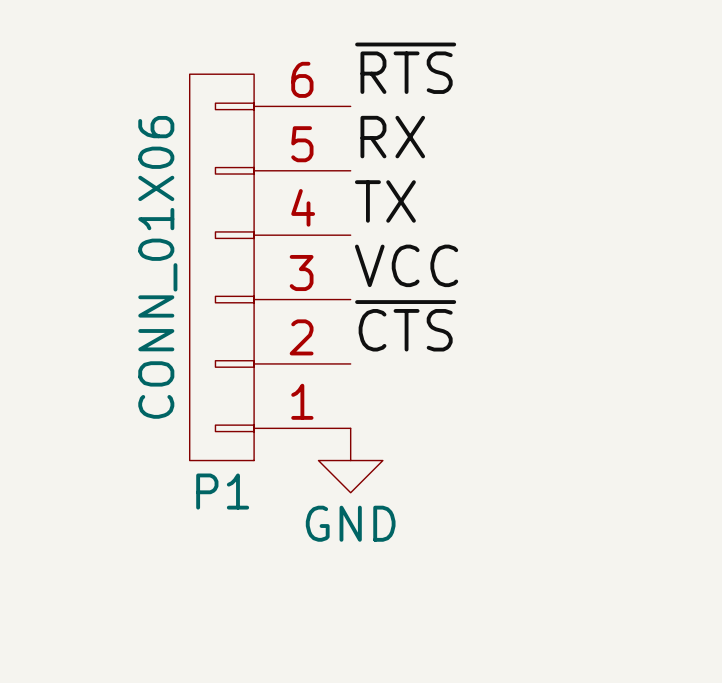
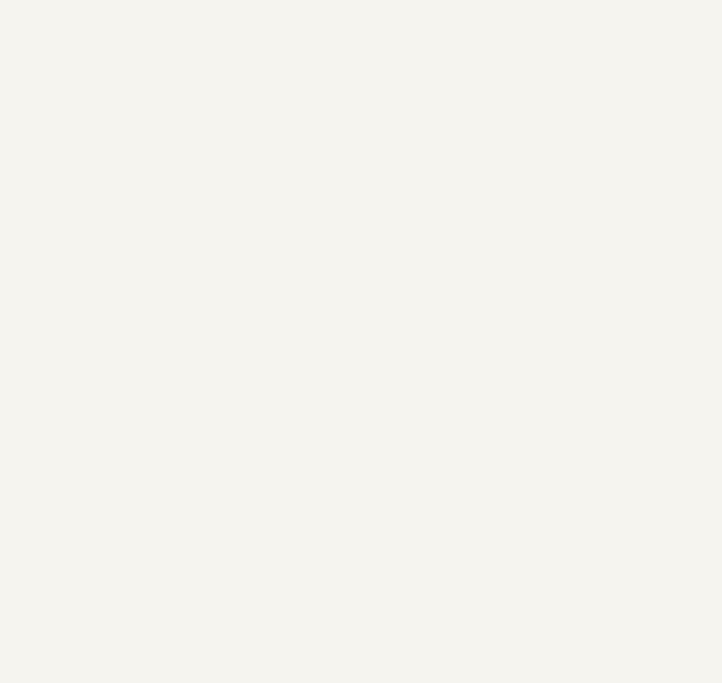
label: ~{RTS} (405, 68) -> none
label: RX (392, 137) -> none
label: TX (385, 201) -> none
label: VCC (406, 265) -> none
P1: CONN_01X06 (270, 267) -> none
label: ~{CTS} (405, 325) -> none
power symbol: GND (350, 460) -> none

